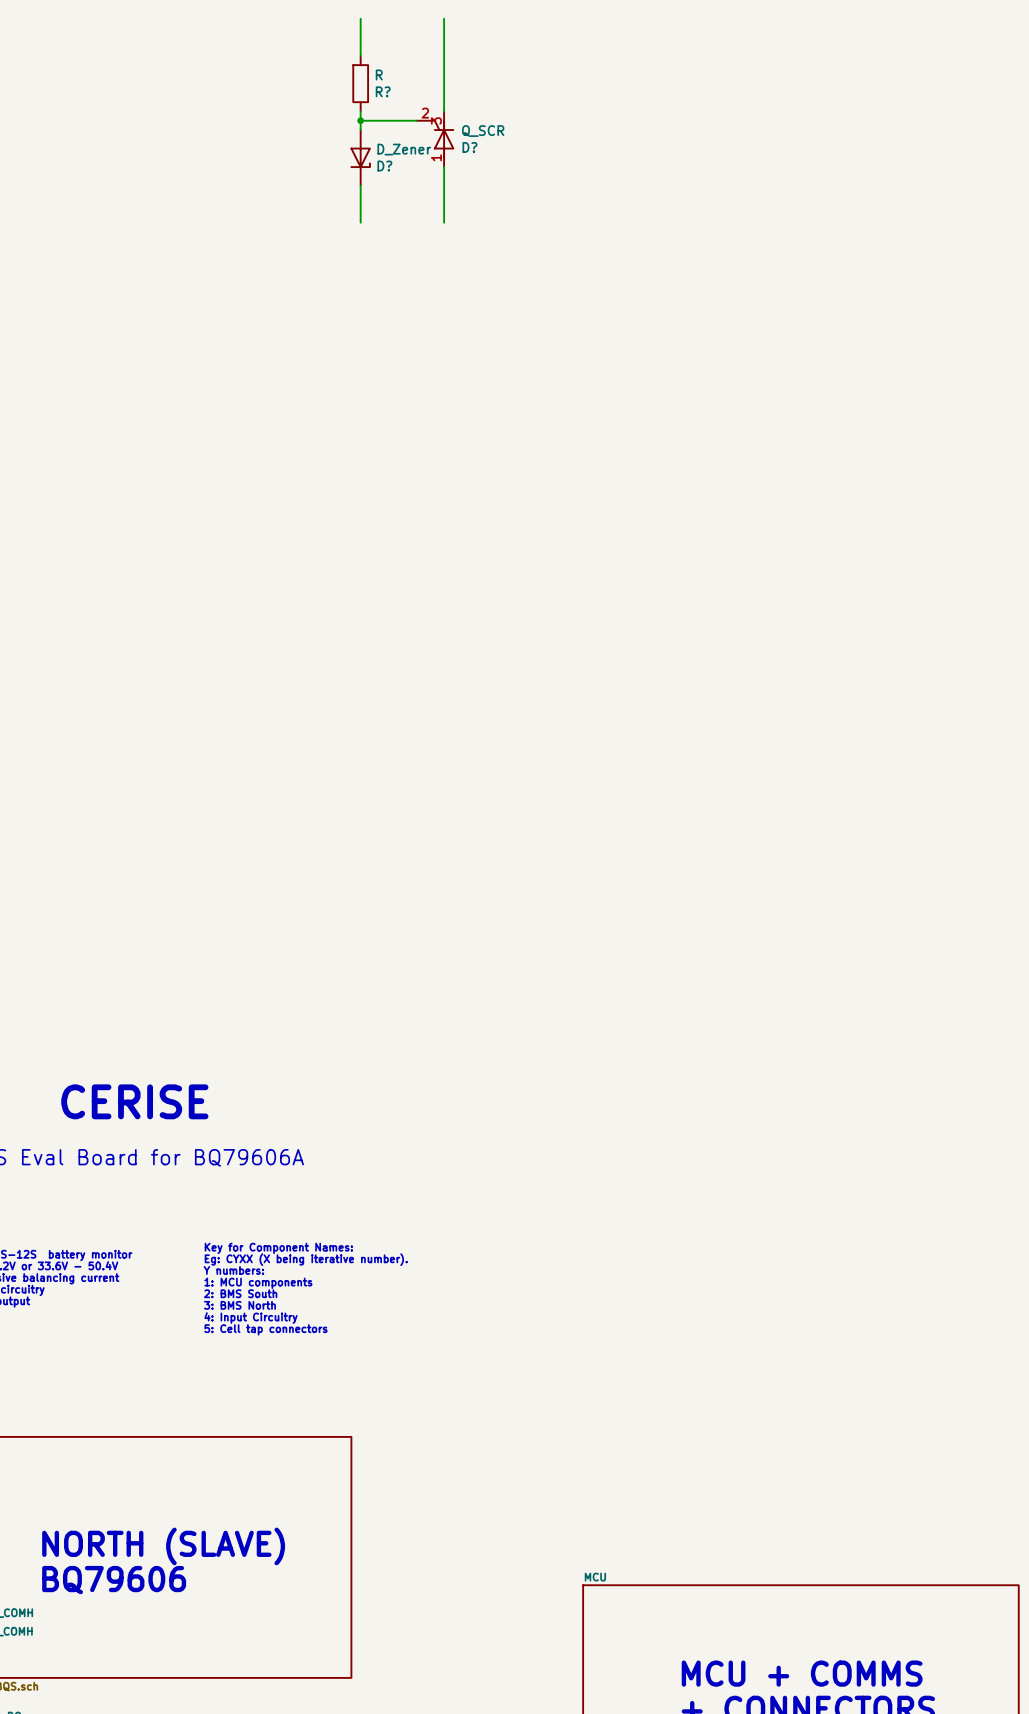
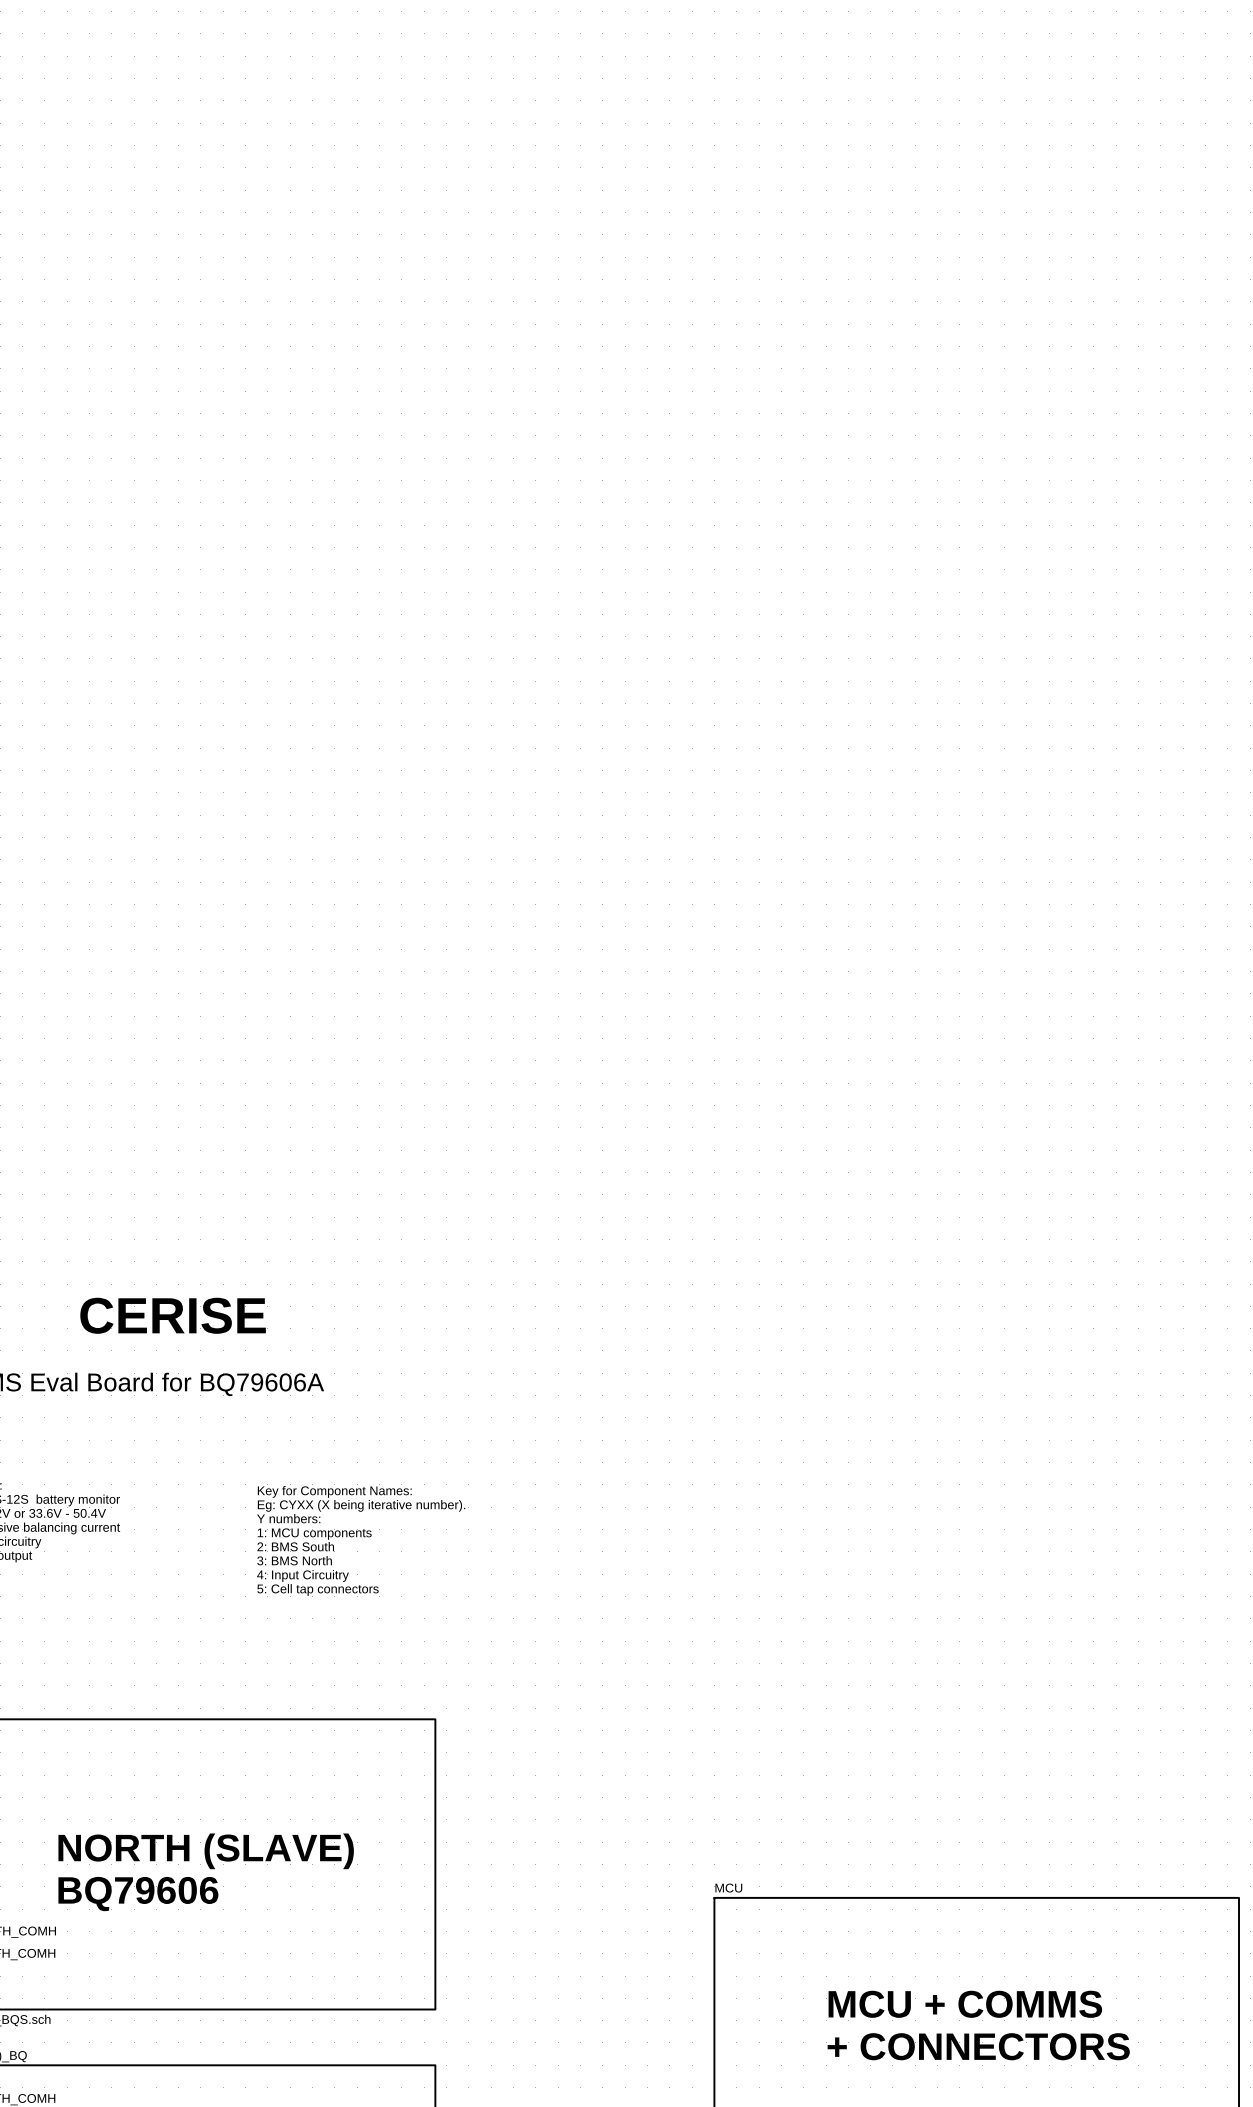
wire: (360, 18) (360, 55) -> none
wire: (444, 18) (444, 111) -> none
R?: R (360, 83) -> none
wire: (360, 111) (360, 130) -> none
wire: (360, 120) (416, 120) -> none
junction: (360, 120) -> none
D?: Q_SCR (435, 139) -> none
D?: D_Zener (360, 157) -> none
wire: (444, 167) (444, 222) -> none
wire: (360, 185) (360, 222) -> none

